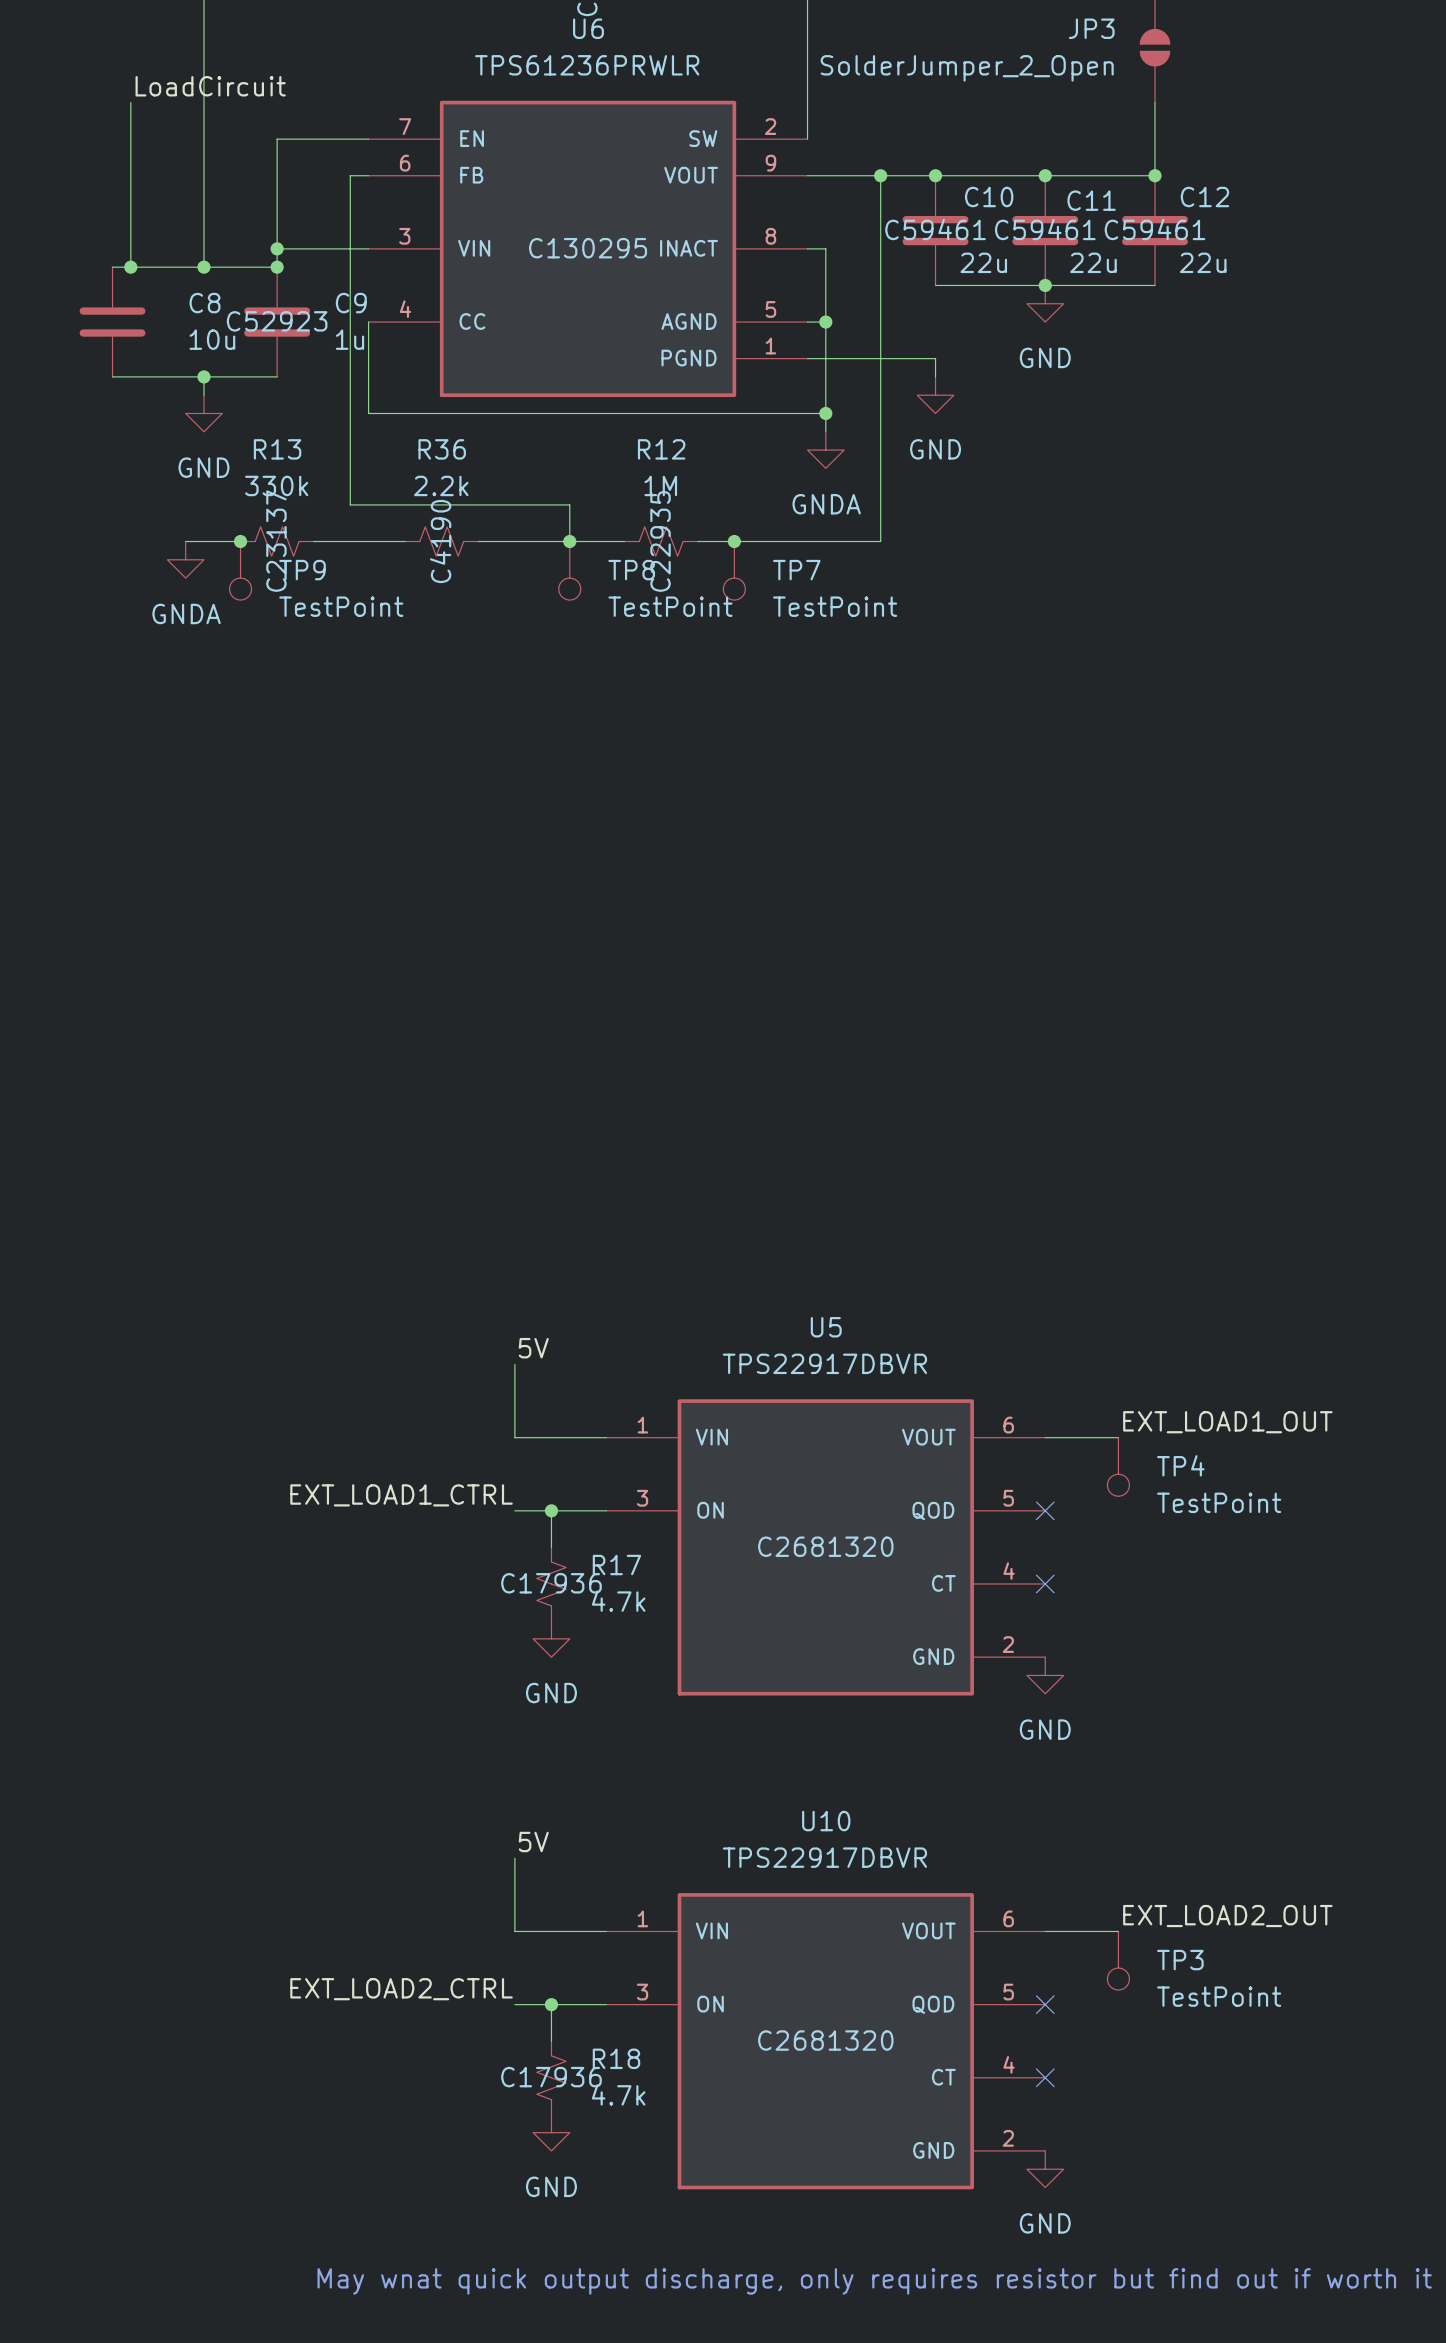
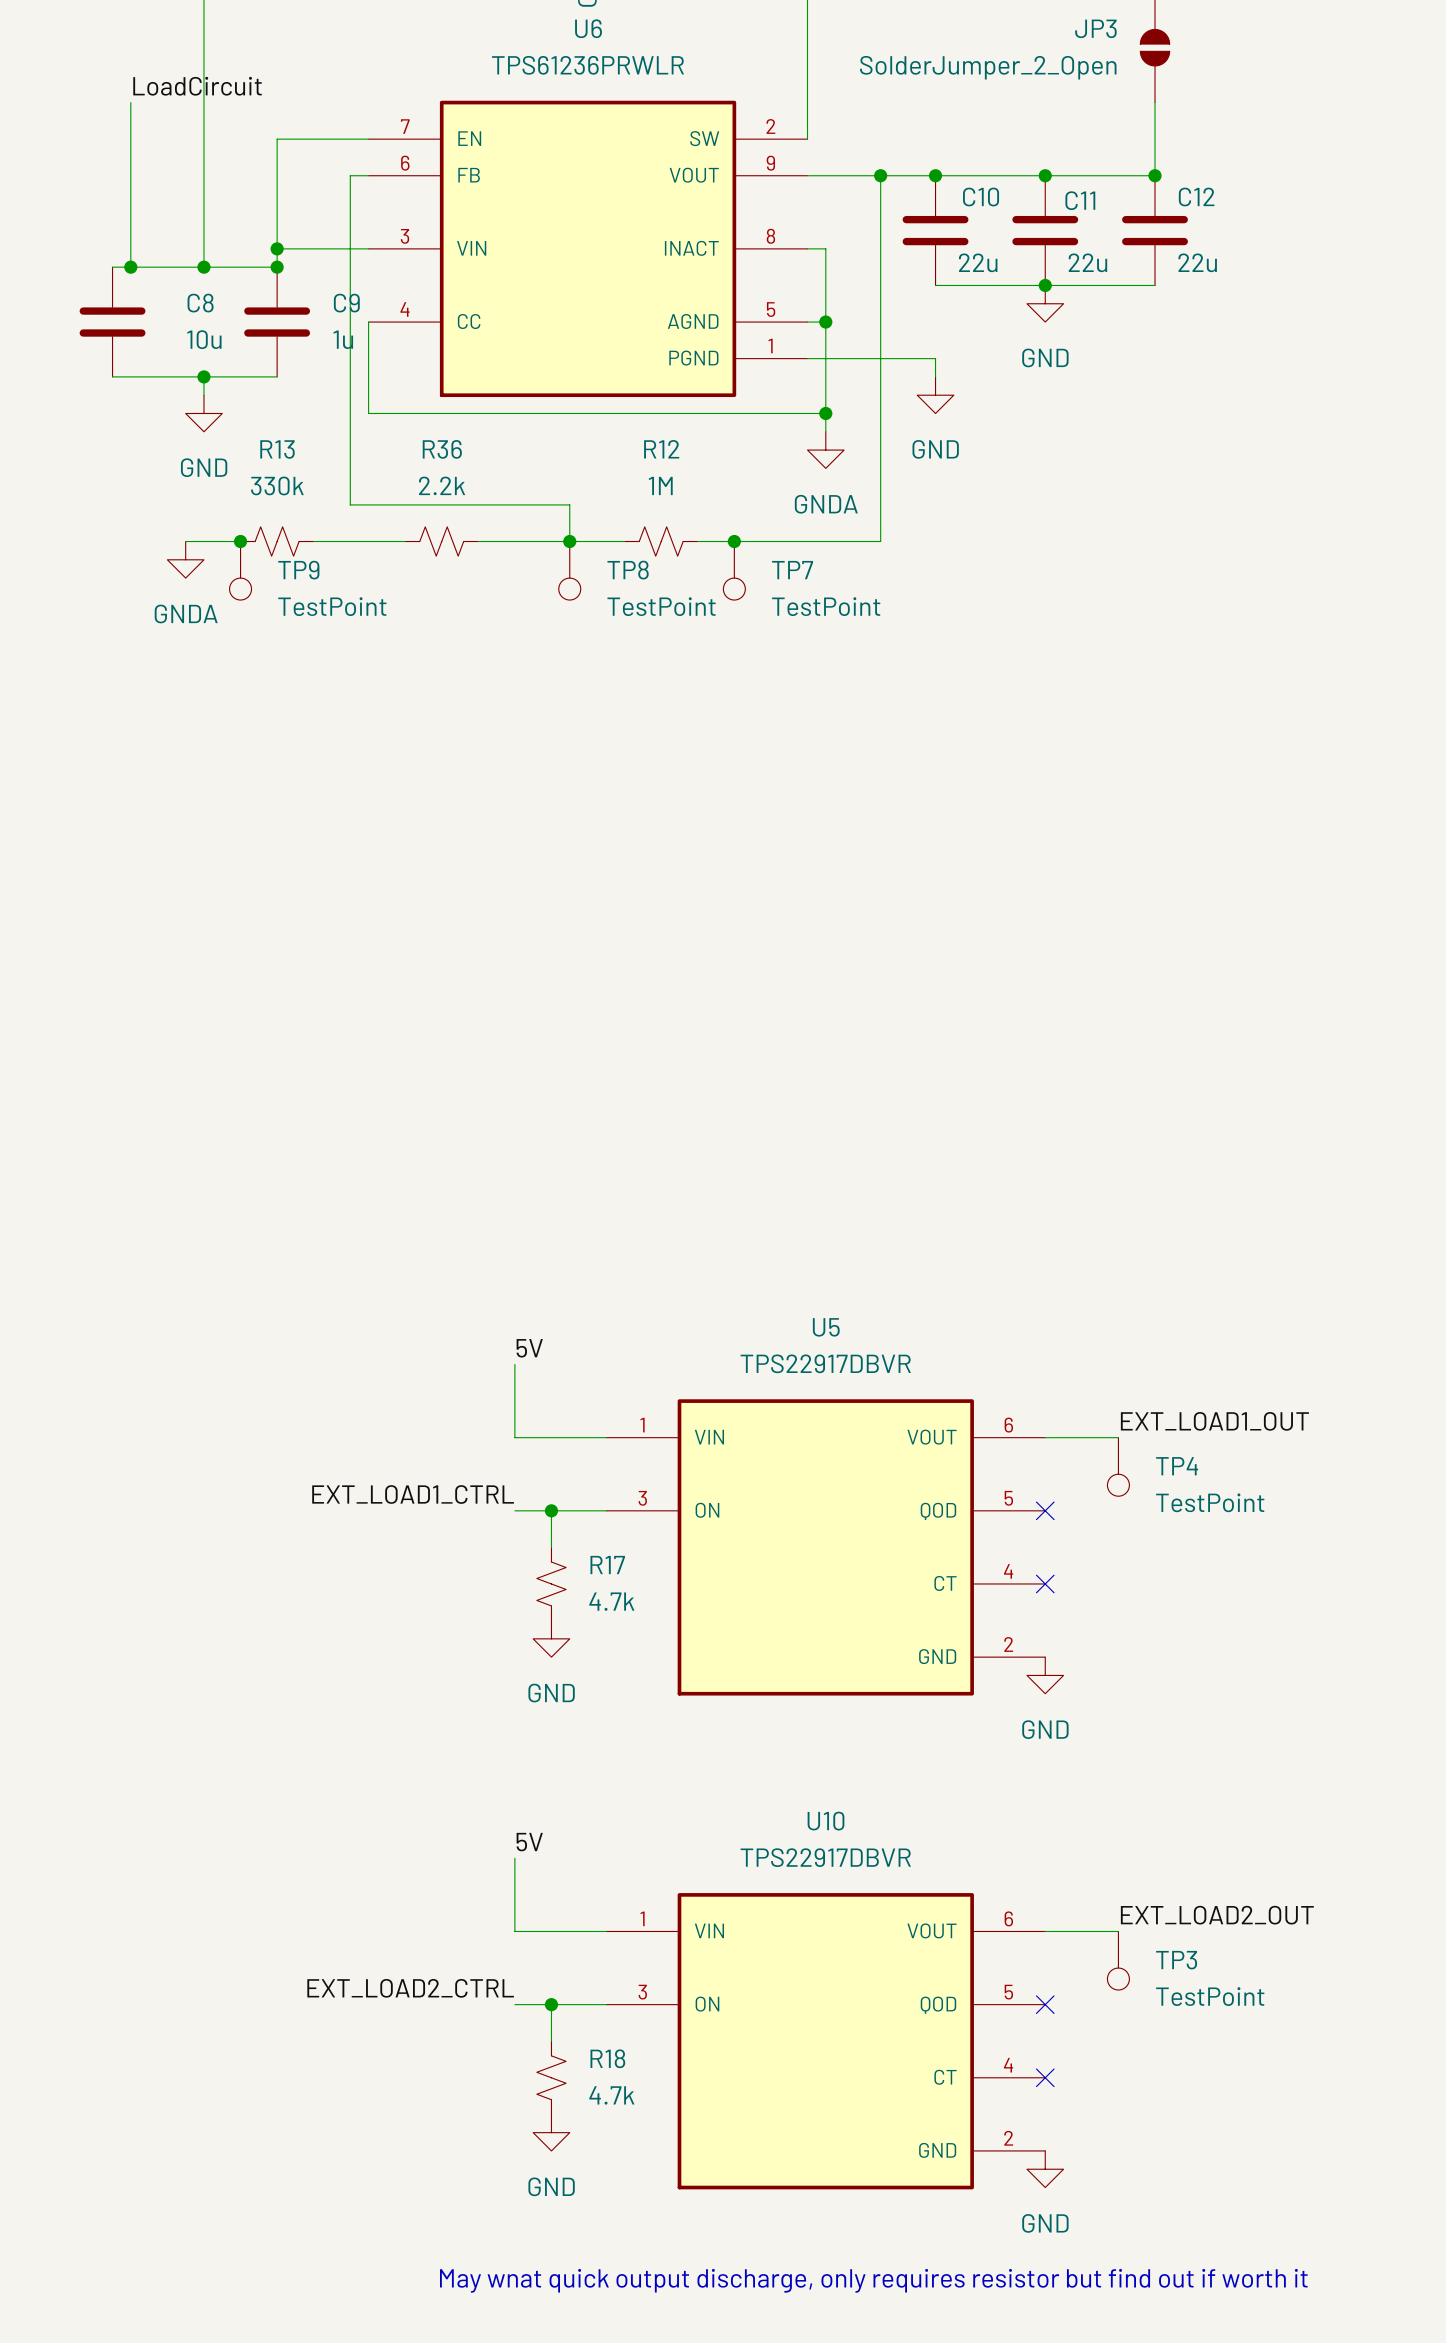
C10 text: C59461 (935, 229) -> none
C11 text: C59461 (1045, 229) -> none
C12 text: C59461 (1155, 229) -> none
U6 text: C130295 (588, 248) -> none
C9 text: C52923 (277, 321) -> none
R13 text: C23137 (276, 541) -> none
R36 text: C4190 (440, 541) -> none
R12 text: C22935 (660, 541) -> none
U5 text: C2681320 (825, 1546) -> none
R17 text: C17936 (551, 1583) -> none
U10 text: C2681320 (825, 2040) -> none
R18 text: C17936 (551, 2077) -> none

